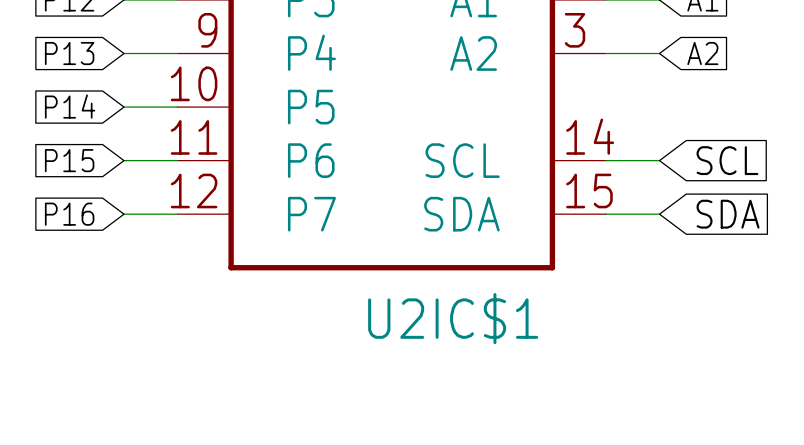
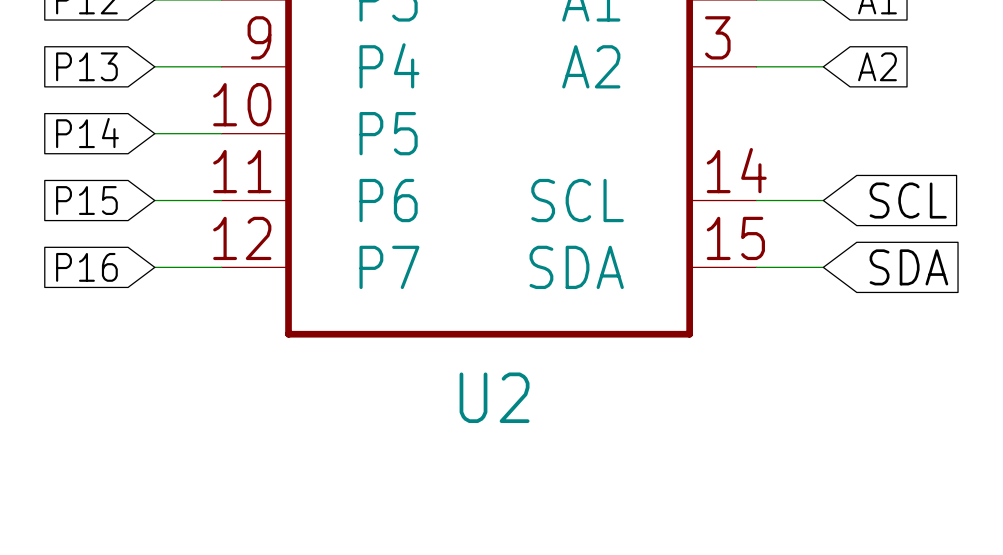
U2IC$1 name: U2IC$1 (453, 318) -> U2 (494, 397)

